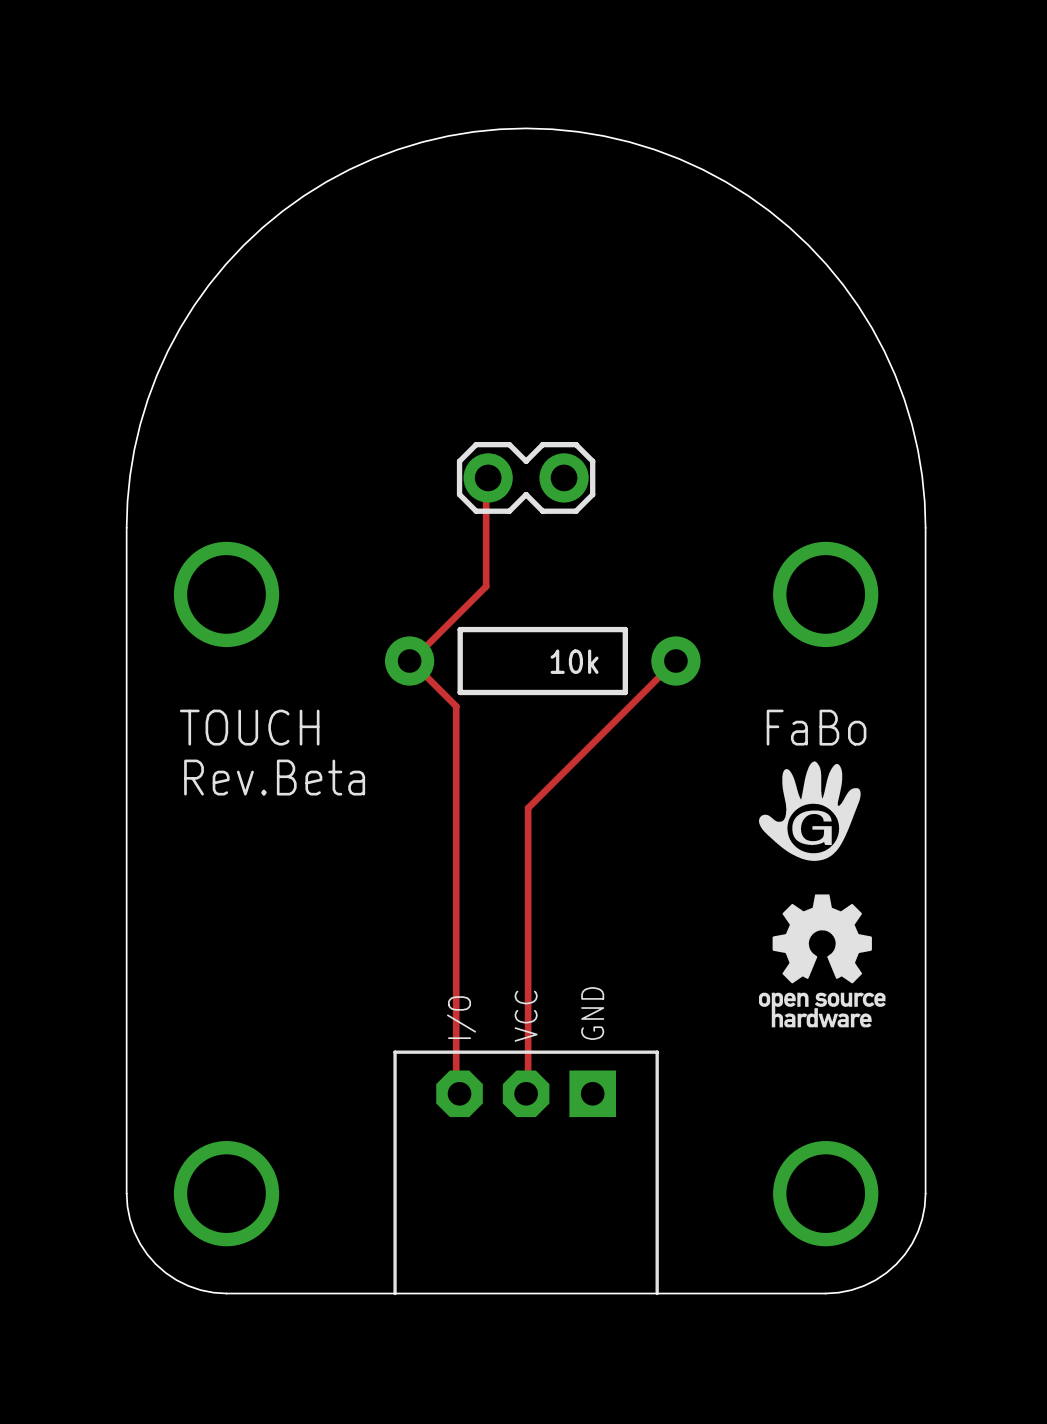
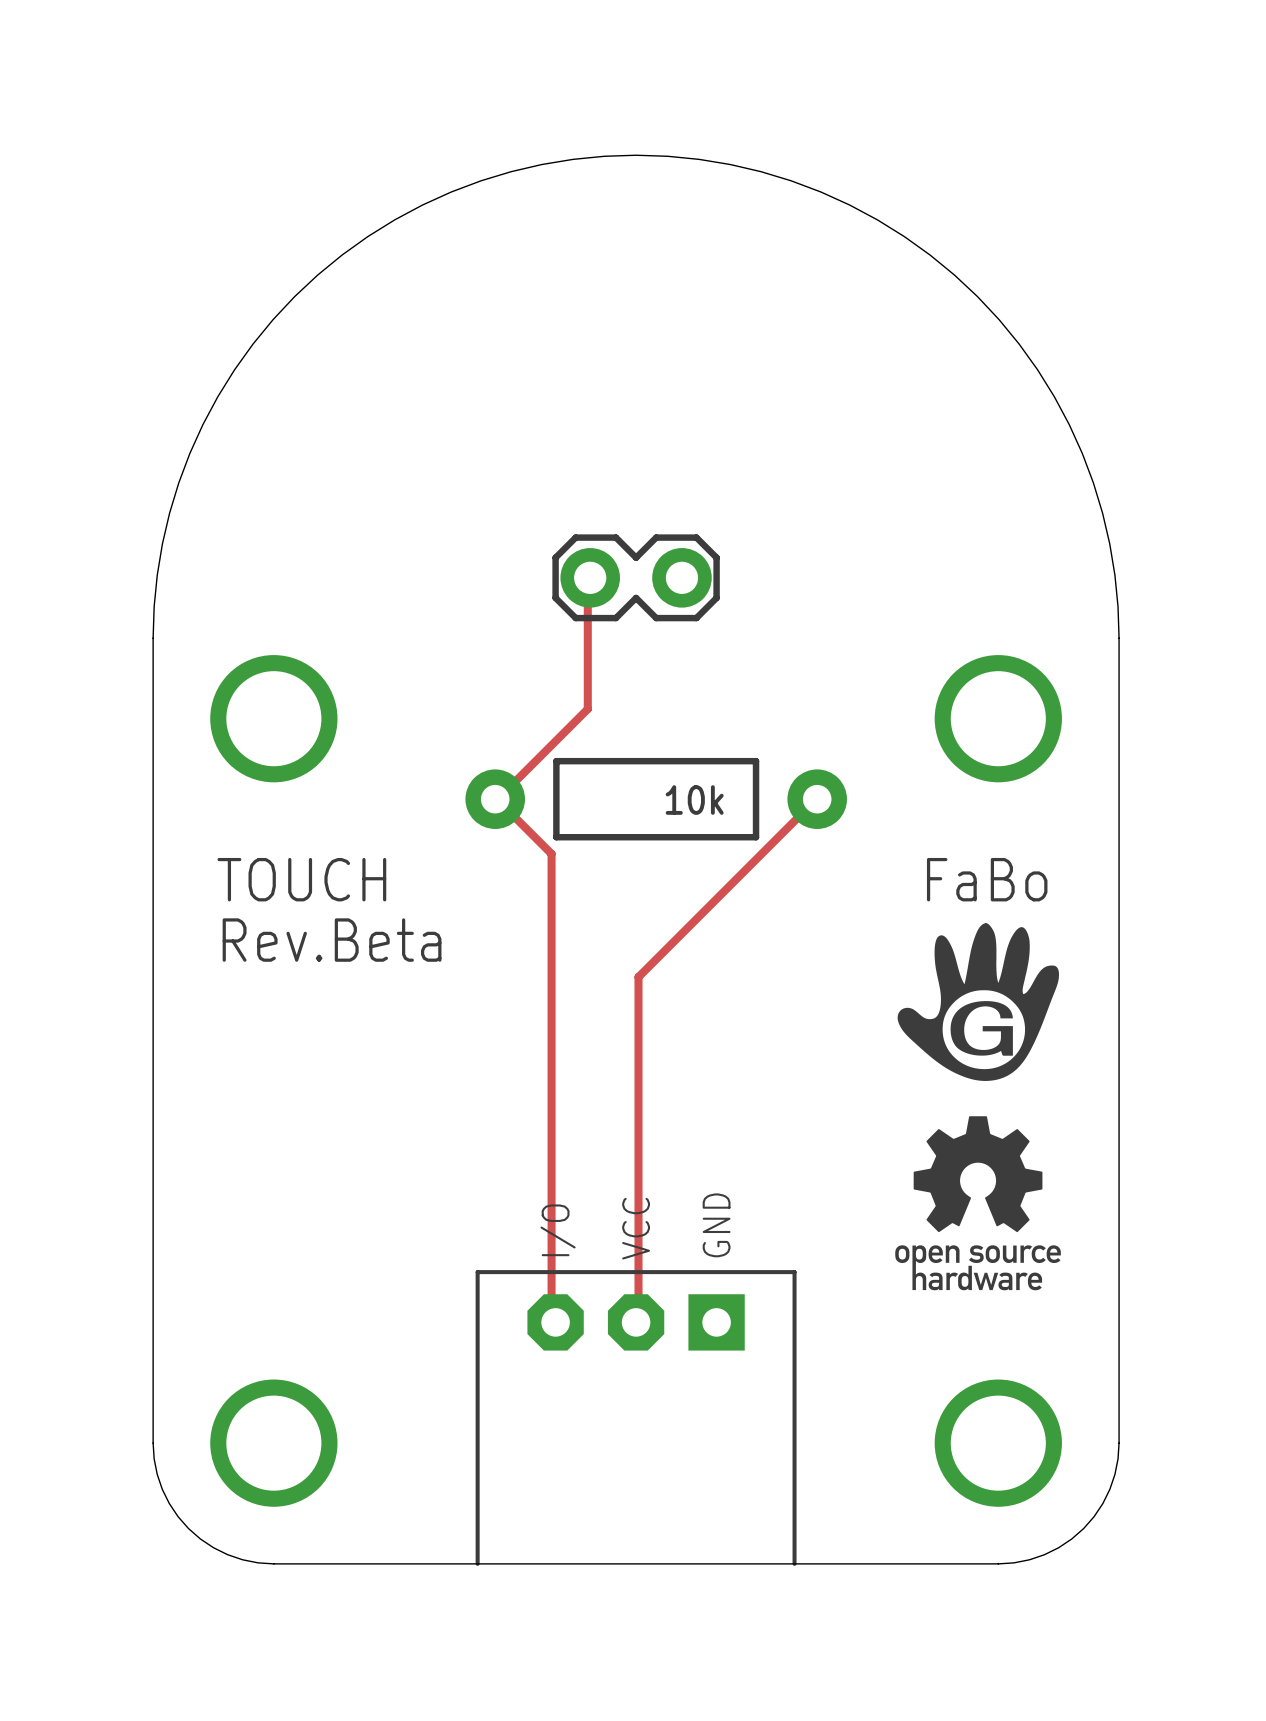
drawing shape: [759, 761, 861, 861] -> [897, 923, 1059, 1081]
drawing: [759, 894, 886, 1028] -> none
drawing: none -> [895, 1116, 1061, 1291]

